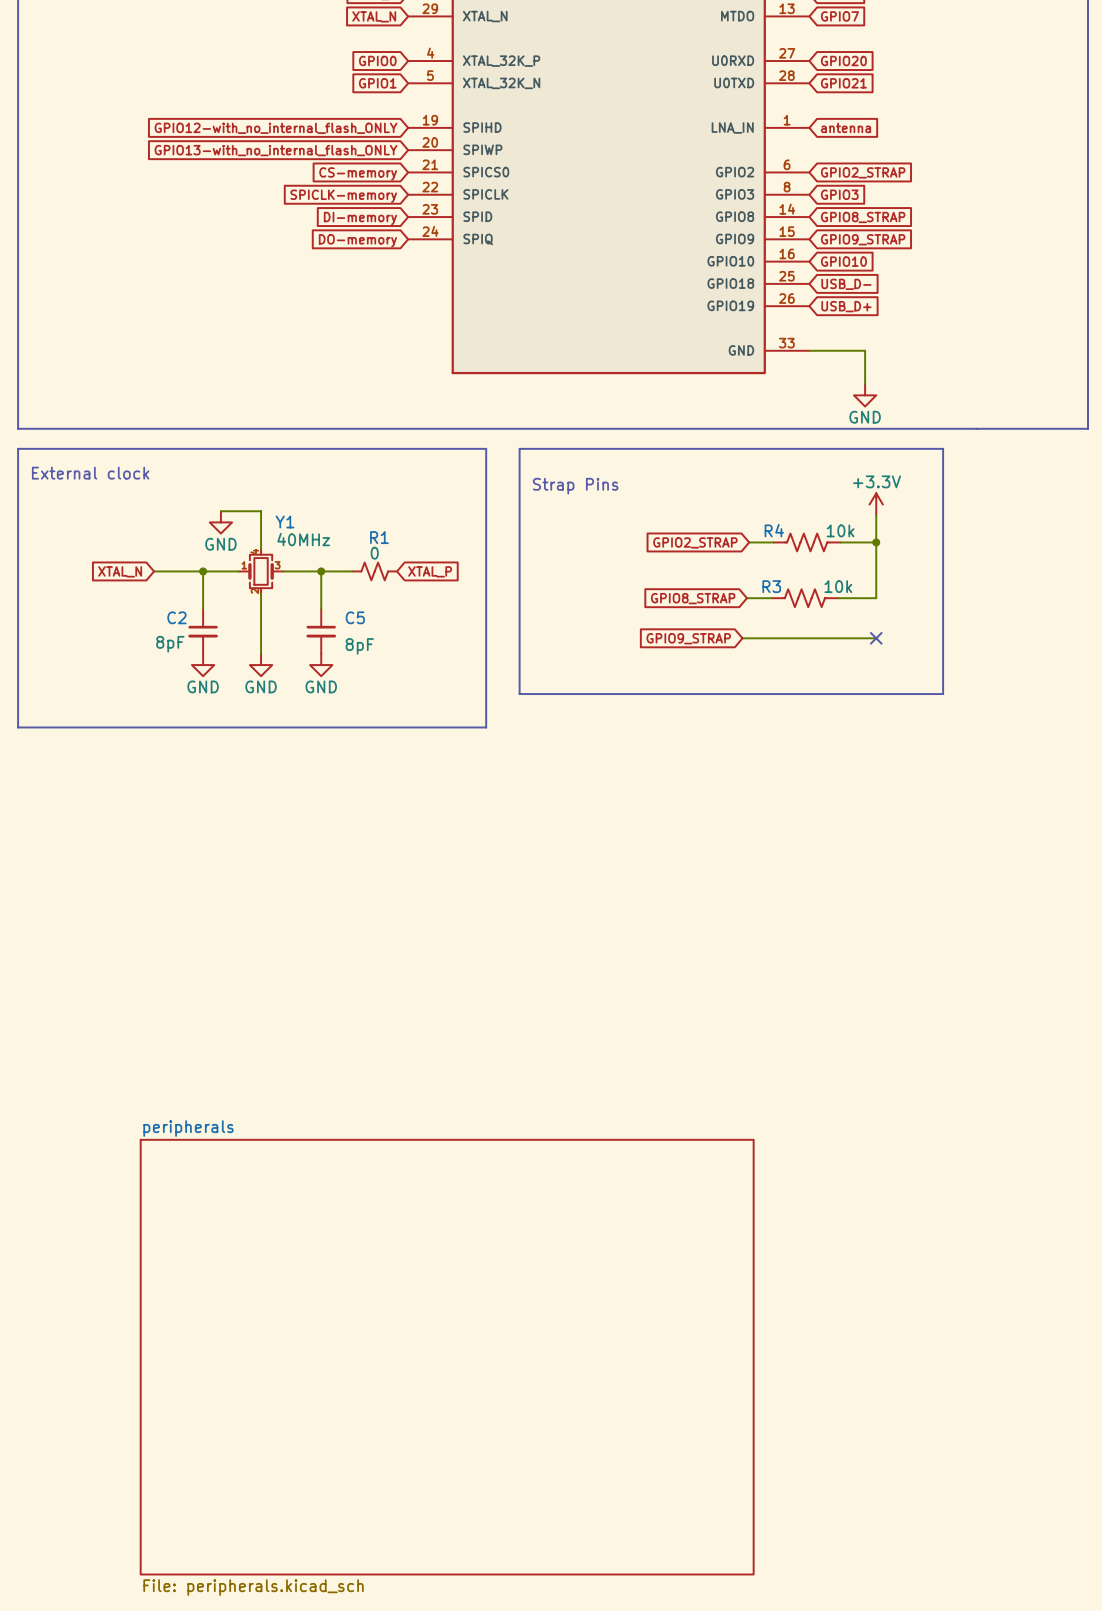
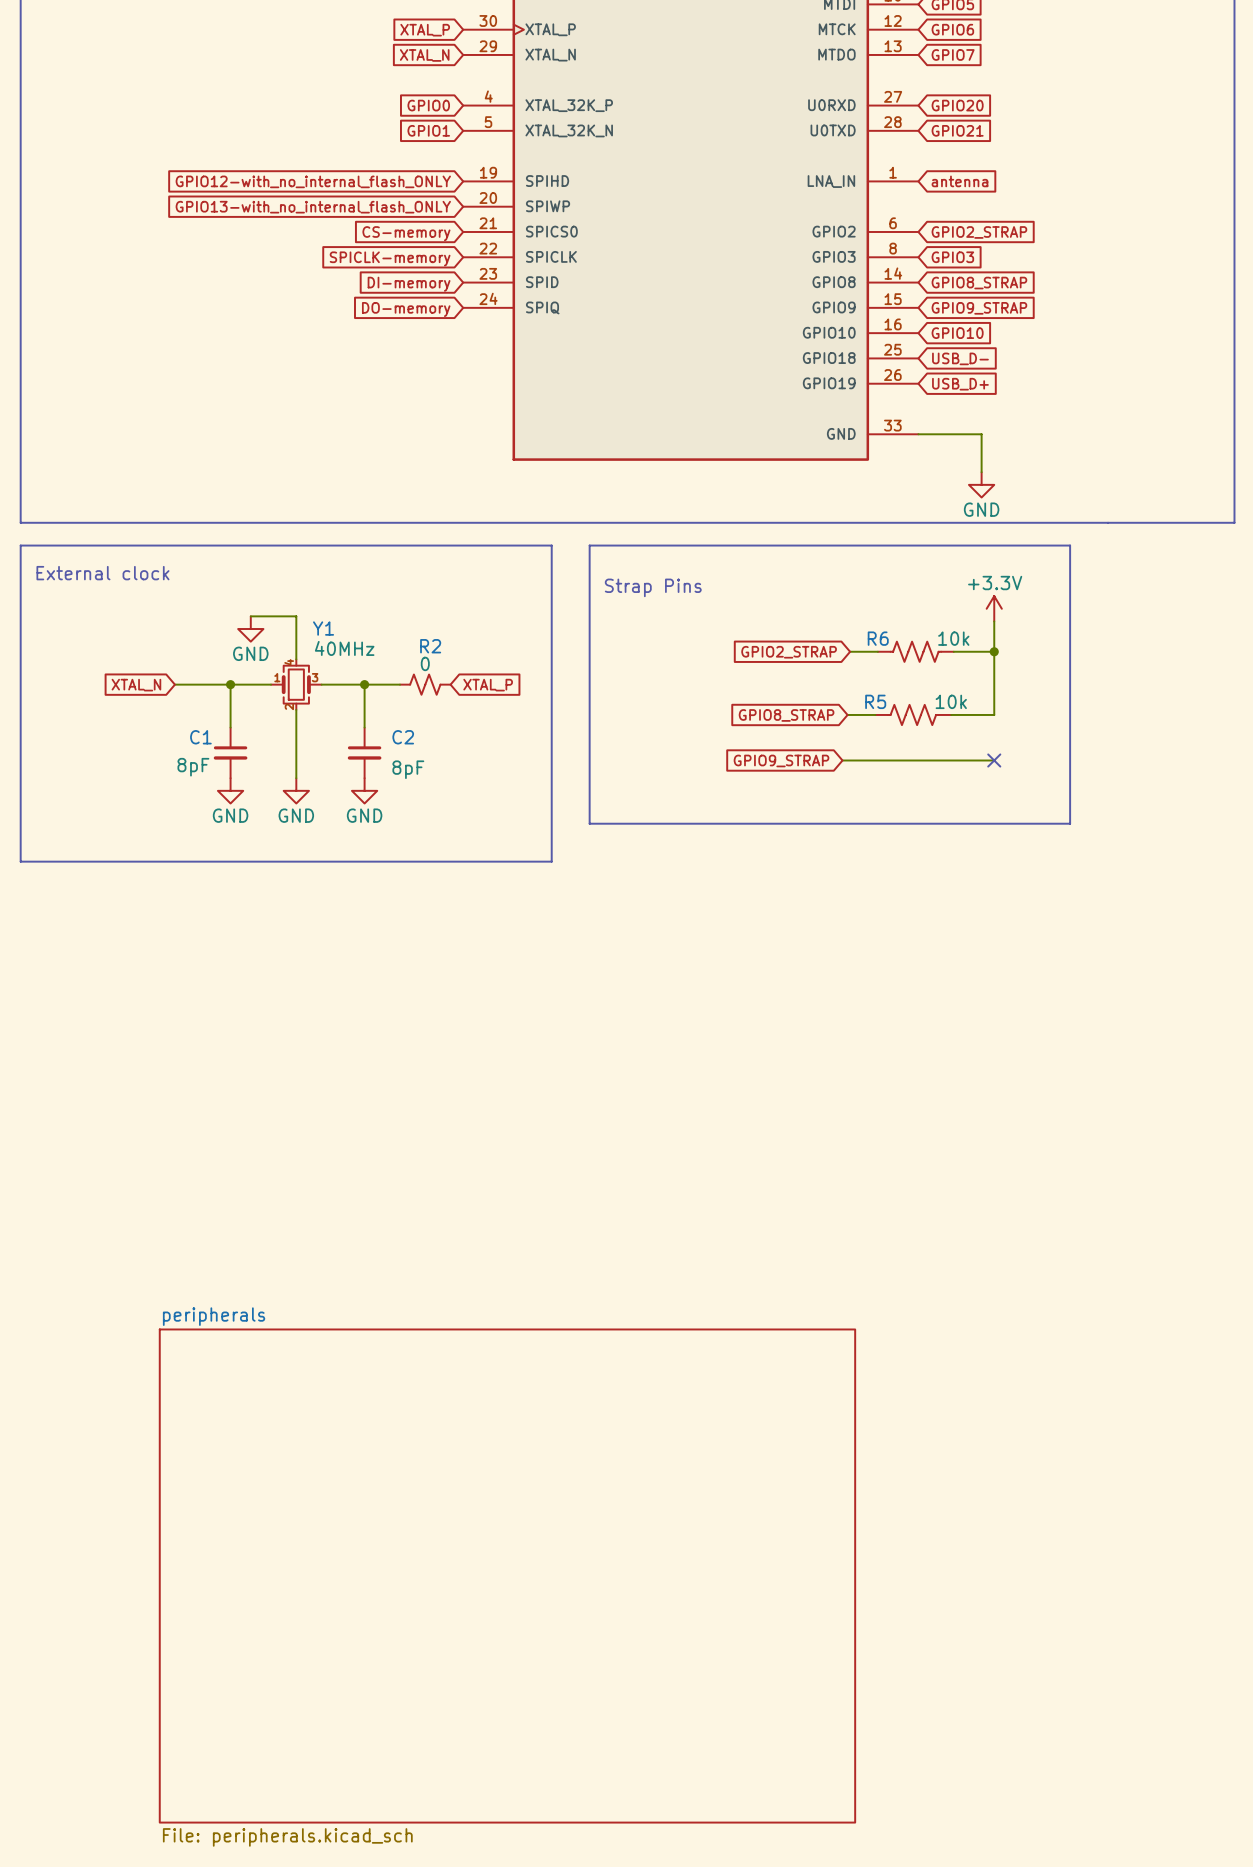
R4 name: R4 (774, 530) -> R6 (878, 638)
R1 name: R1 (379, 537) -> R2 (430, 646)
R3 name: R3 (771, 586) -> R5 (875, 701)
C2 name: C2 (176, 617) -> C1 (200, 737)
C5 name: C5 (355, 617) -> C2 (403, 737)

